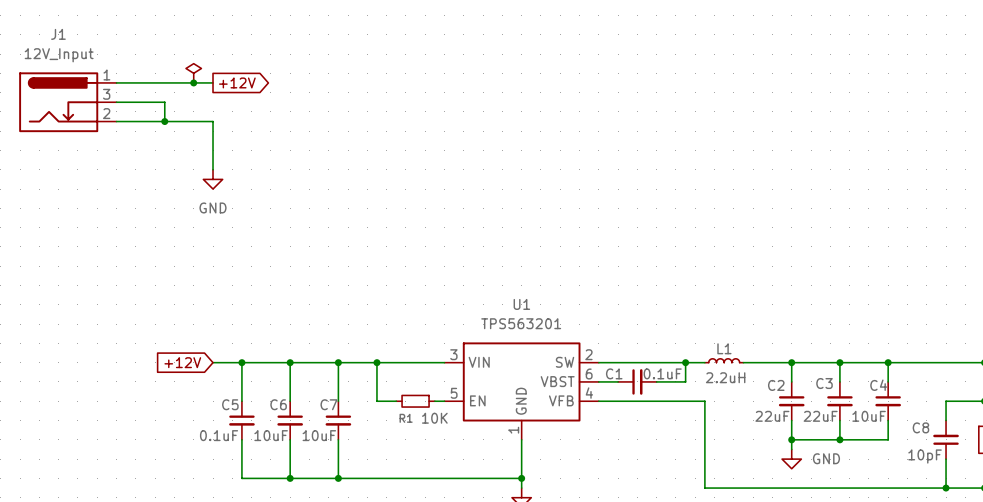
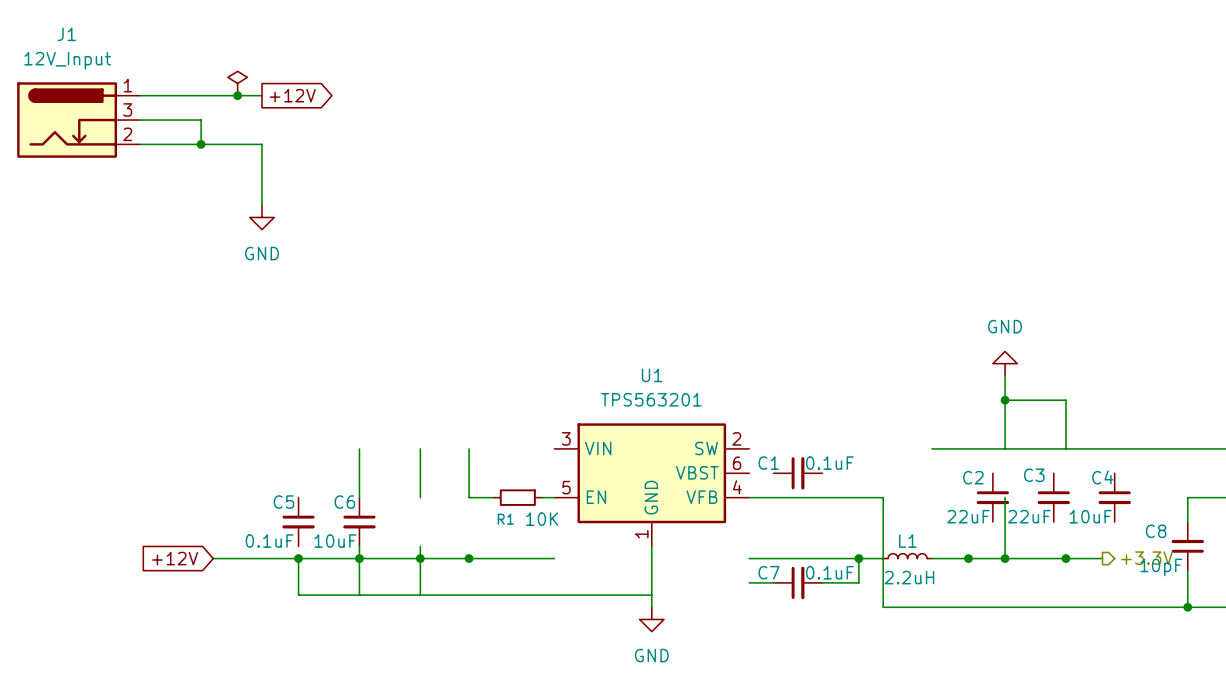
wire: none -> (1005, 375) (1005, 448)
wire: none -> (1005, 400) (1065, 400) (1065, 448)
junction: none -> (1005, 400)
L1 position: (724, 360) -> (907, 556)
global label position: +12V (182, 362) -> +12V (175, 558)
wire: (213, 362) (444, 362) -> none
wire: (241, 362) (241, 401) -> none
junction: (241, 362) -> none
junction: (290, 362) -> none
junction: (338, 362) -> none
junction: (376, 362) -> none
wire: (598, 362) (704, 362) -> (749, 558) (883, 558)
wire: (685, 362) (685, 381) (656, 381) -> (858, 558) (858, 582) (822, 582)
junction: (685, 362) -> none
wire: (791, 362) (791, 381) -> none
junction: (791, 362) -> none
wire: (839, 362) (839, 381) -> none
junction: (839, 362) -> none
wire: (888, 362) (888, 381) -> none
junction: (888, 362) -> none
wire: (598, 381) (618, 381) -> (749, 582) (773, 582)
wire: none -> (1005, 497) (1005, 558)
C7 name position: C7 (328, 404) -> C7 (769, 572)
C7 rotation: 0° (338, 420) -> 90° counterclockwise (798, 582)
C7 position: (338, 420) -> (797, 582)
wire: (791, 420) (791, 449) -> none
wire: (839, 420) (839, 439) -> none
wire: (888, 420) (888, 439) (791, 439) -> none
C7 value: 10uF (319, 435) -> 0.1uF (829, 572)
wire: (241, 439) (241, 449) -> none
junction: (791, 439) -> none
junction position: (839, 439) -> (1065, 558)
wire: none -> (213, 558) (554, 558)
junction: none -> (298, 558)
junction: none -> (359, 558)
junction: none -> (420, 558)
junction: none -> (469, 558)
junction: none -> (858, 558)
wire: none -> (931, 558) (1102, 558)
junction: none -> (968, 558)
junction: none -> (1005, 558)
hierarchical label: none -> +3.3V (1147, 558)
power symbol text position: GND (826, 458) -> GND (1005, 326)
power symbol rotation: 0° (791, 459) -> 180° (1005, 363)
power symbol position: GND (791, 459) -> GND (1005, 363)
junction: (290, 478) -> none
junction: (338, 478) -> none
junction: (521, 478) -> none

